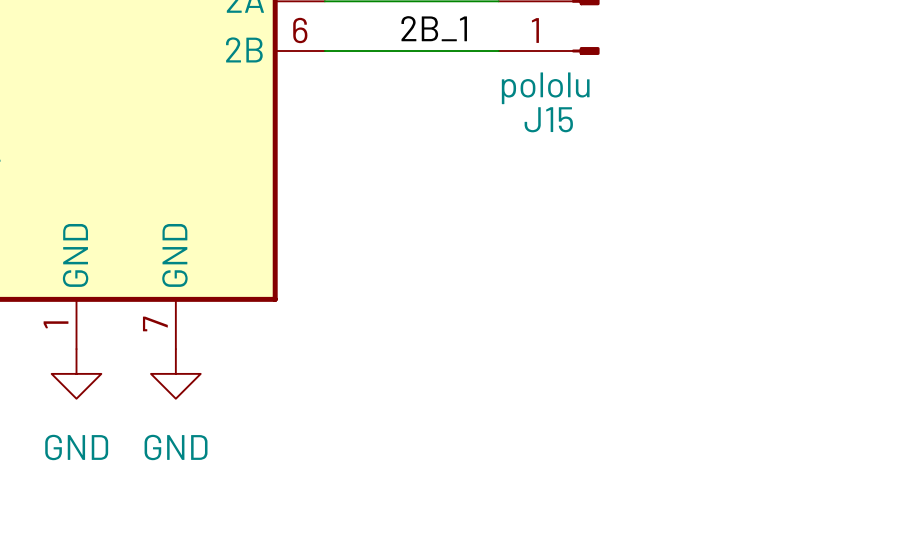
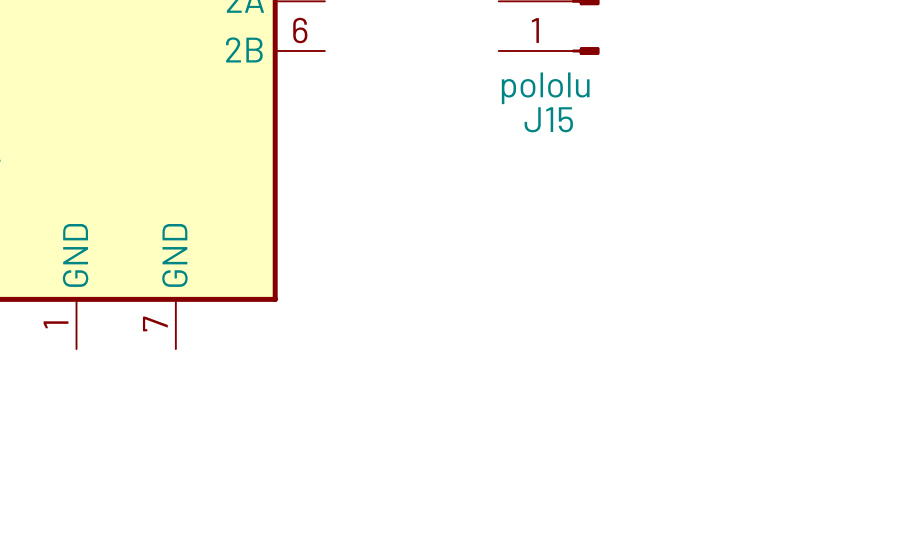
wire: (324, 1) (498, 1) -> none
label: 2B_1 (434, 28) -> none
wire: (324, 51) (498, 51) -> none
power symbol: GND (76, 373) -> none
power symbol: GND (175, 373) -> none

